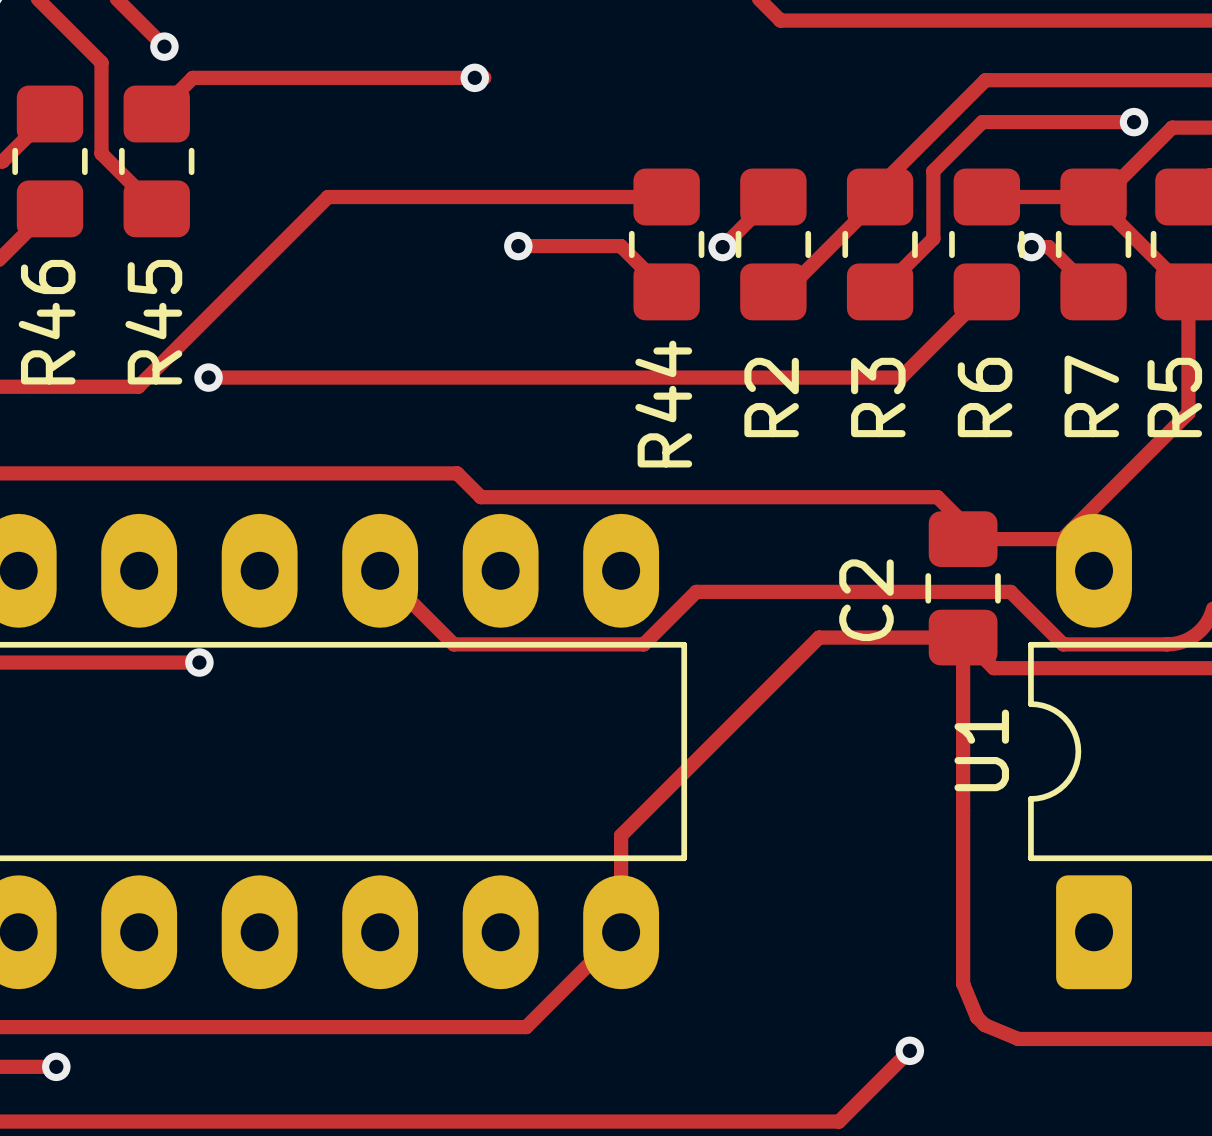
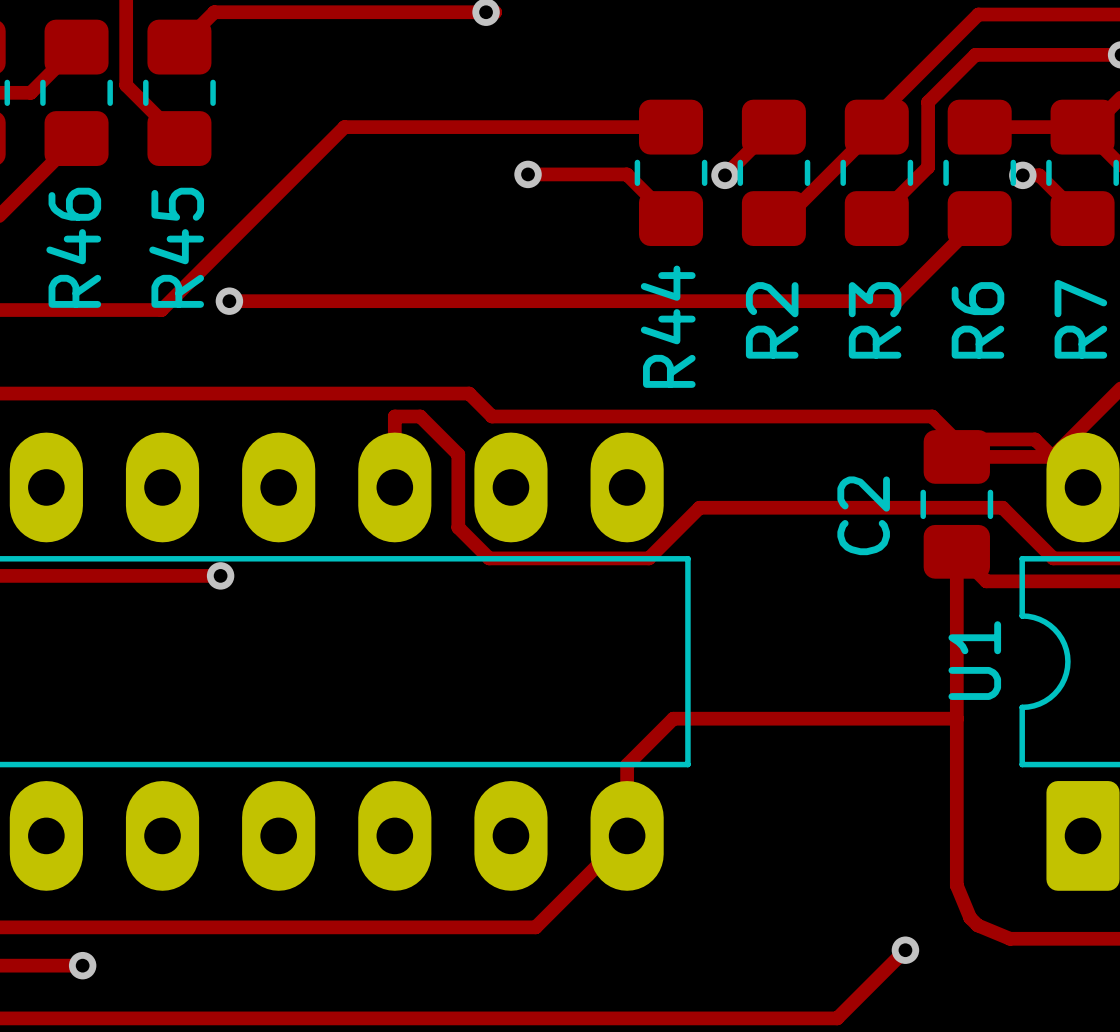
track: none -> (955, 439) (1035, 439) (1052, 456)
track: (380, 570) (453, 644) (478, 644) -> (394, 487) (394, 416) (420, 416) (458, 454) (458, 527) (489, 558)
track: (963, 637) (819, 637) (621, 835) (621, 858) -> (956, 718) (673, 718) (627, 764)

